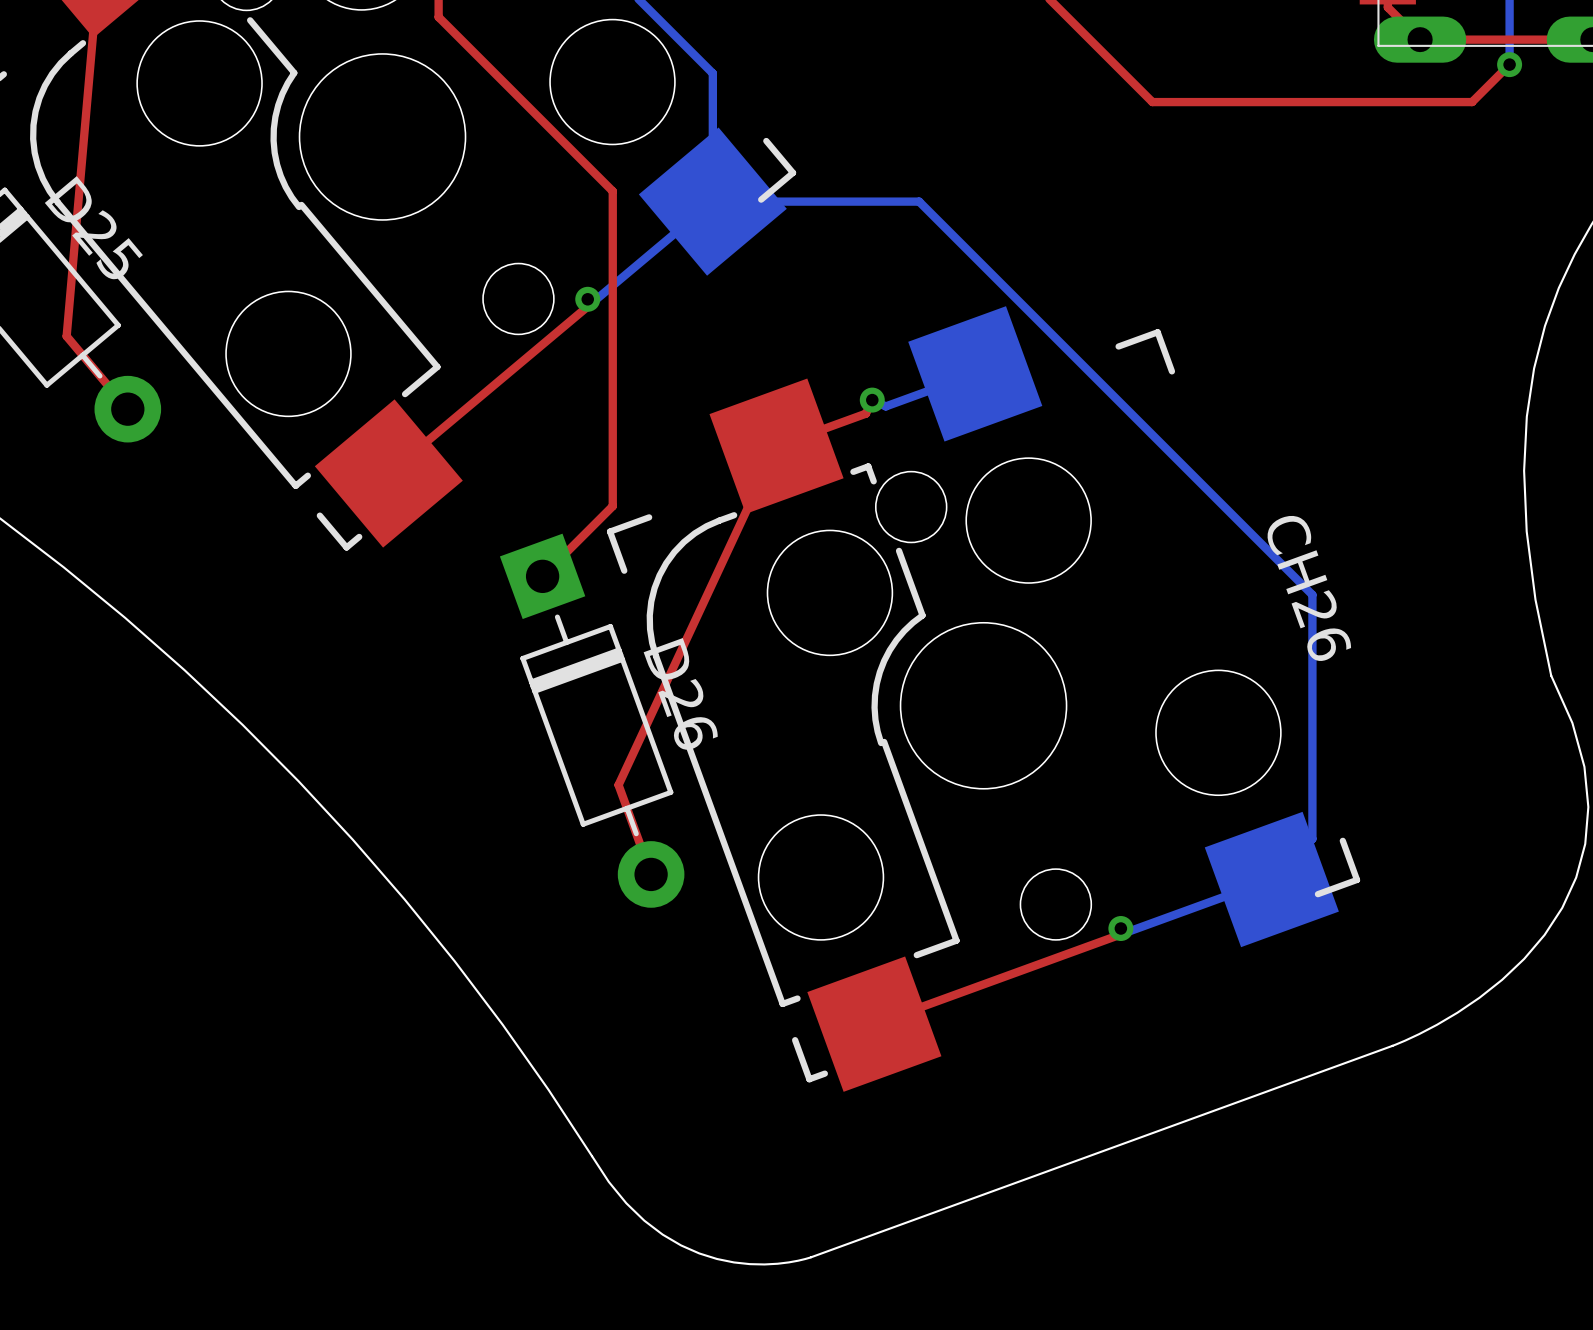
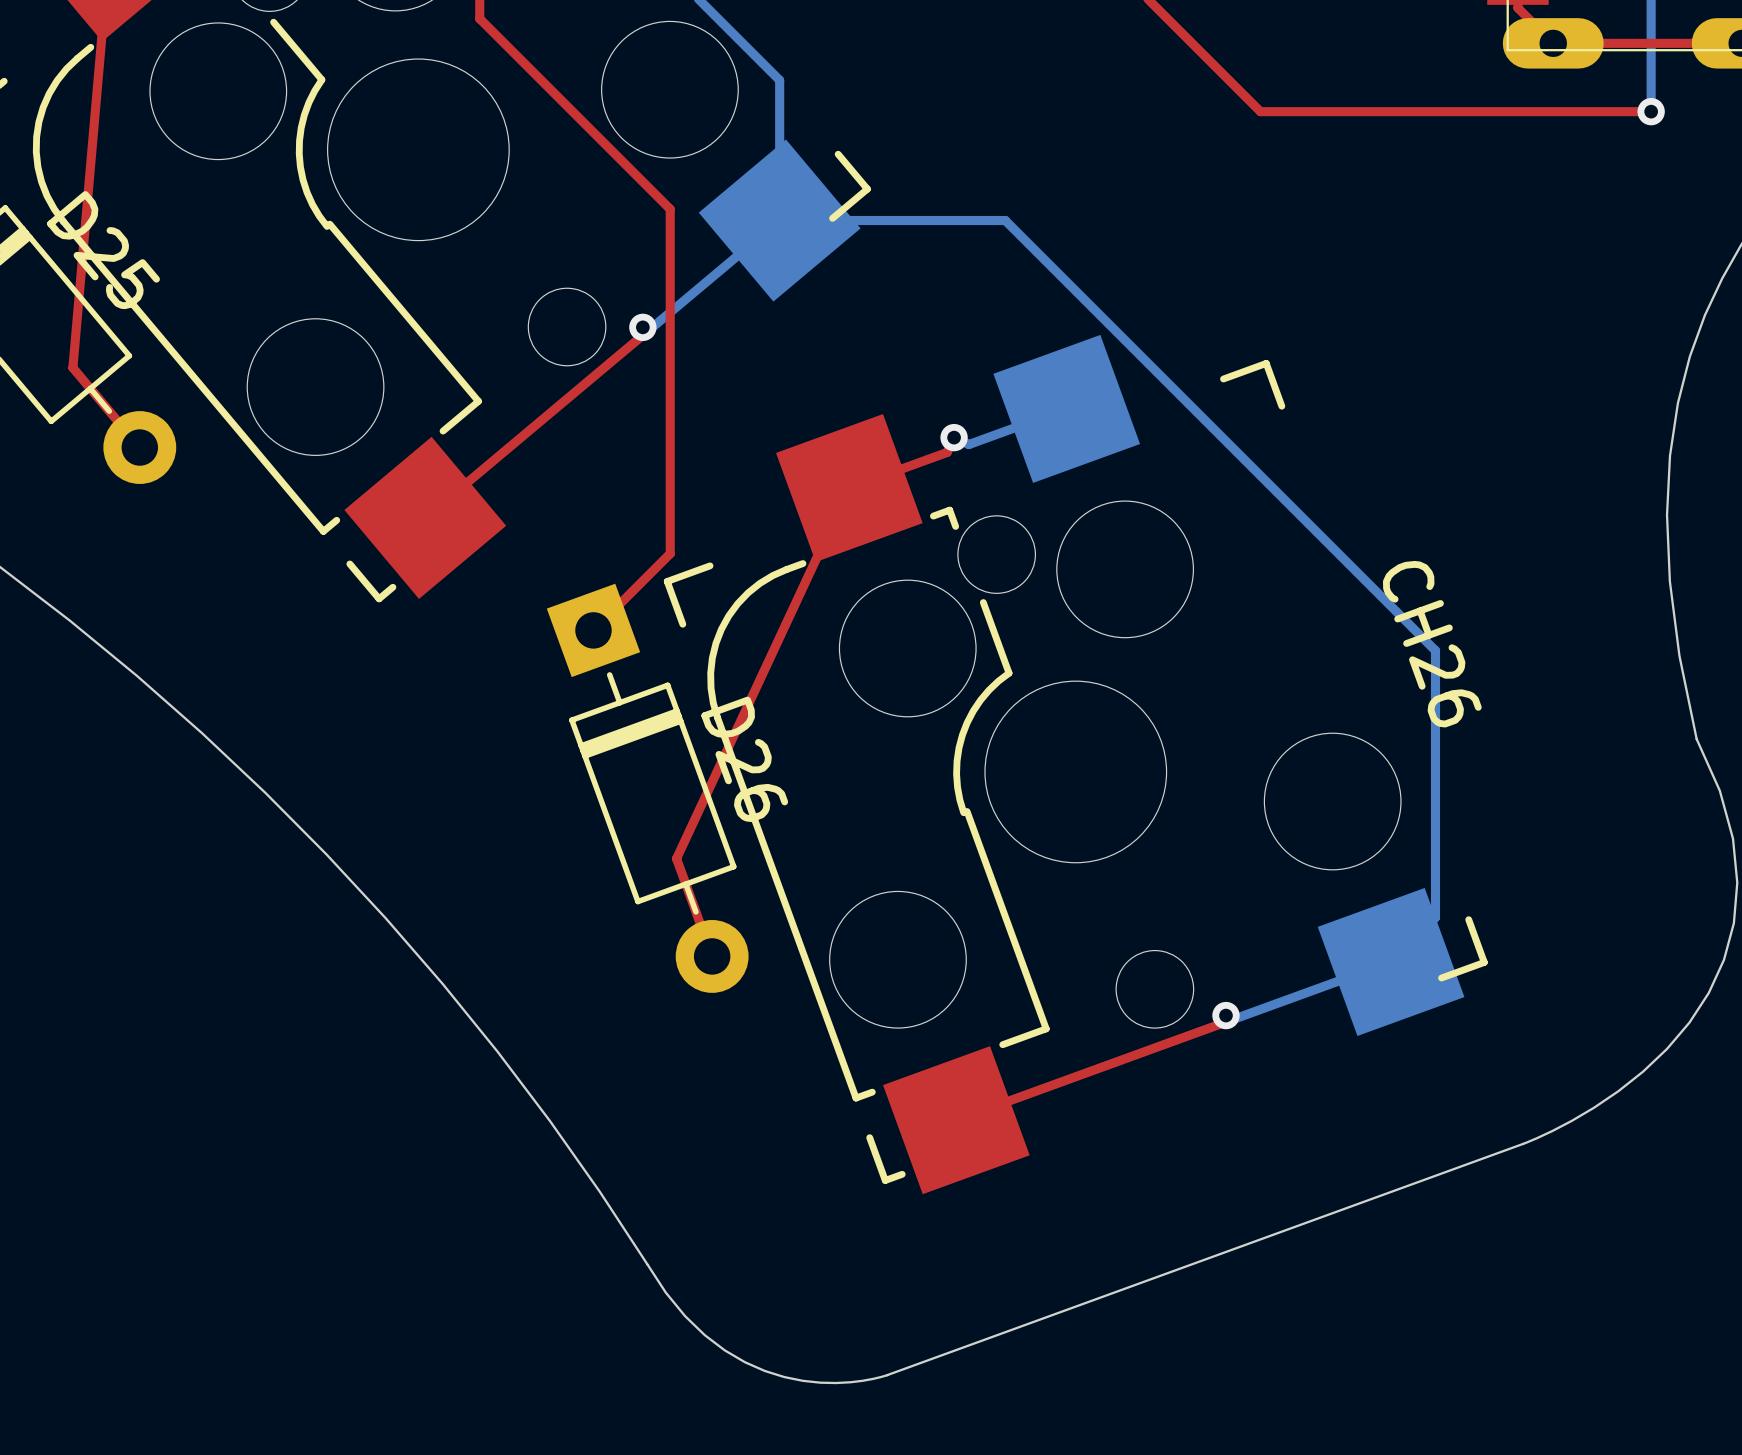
top track: (1509, 64) (1472, 102) -> (1651, 111) (1610, 111)
bottom track: none -> (1651, 70) (1651, 111)
via position: (1509, 64) -> (1651, 111)

